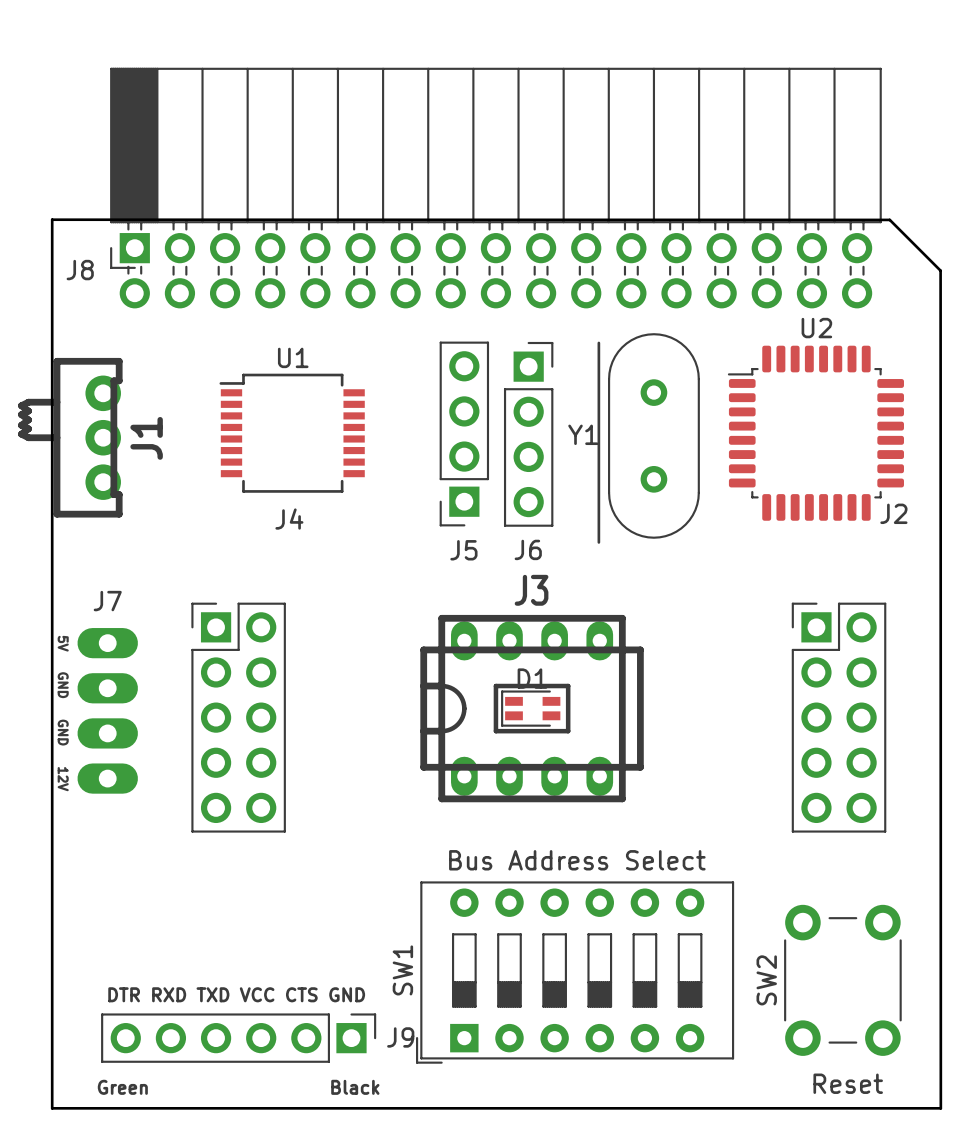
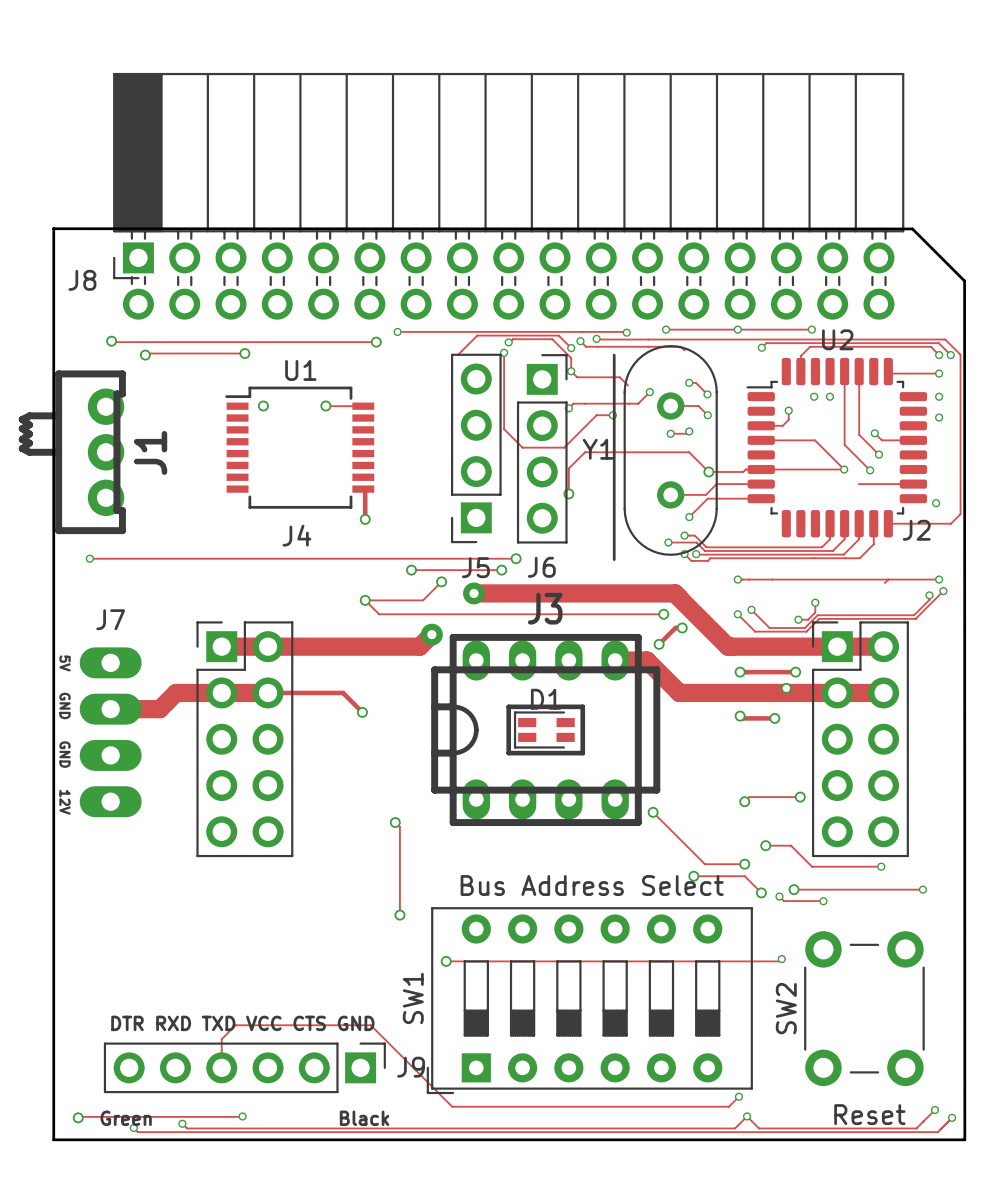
track: none -> (666, 329) (811, 329)
via: none -> (666, 329)
via: none -> (737, 329)
via: none -> (811, 329)
track: none -> (397, 331) (626, 332)
via: none -> (397, 331)
via: none -> (626, 332)
track: none -> (596, 338) (945, 339) (960, 354) (960, 514) (951, 523) (888, 523)
via: none -> (596, 338)
track: none -> (111, 341) (376, 342)
via: none -> (111, 341)
track: none -> (580, 341) (586, 346) (680, 346) (684, 350)
via: none -> (580, 341)
via: none -> (376, 342)
track: none -> (508, 342) (512, 339) (552, 339) (571, 358) (571, 371) (577, 377) (619, 377) (628, 385)
via: none -> (508, 342)
track: none -> (761, 347) (766, 343) (938, 343) (953, 357)
via: none -> (761, 347)
track: none -> (571, 348) (558, 335) (477, 335) (457, 355)
via: none -> (571, 348)
track: none -> (504, 352) (504, 429) (522, 447) (564, 447) (596, 415) (612, 415)
via: none -> (504, 352)
track: none -> (244, 353) (146, 353) (145, 355)
via: none -> (244, 353)
via: none -> (145, 355)
track: none -> (939, 355) (930, 346) (810, 346) (800, 356) (800, 371)
via: none -> (939, 355)
via: none -> (950, 355)
via: none -> (571, 371)
track: none -> (844, 371) (844, 444) (870, 470)
track: none -> (859, 371) (859, 434) (878, 454)
track: none -> (888, 371) (890, 373) (936, 373)
via: none -> (939, 373)
track: none -> (689, 382) (695, 382) (707, 394)
via: none -> (689, 382)
track: none -> (649, 392) (638, 403) (573, 403) (568, 408)
via: none -> (649, 392)
via: none -> (707, 394)
via: none -> (814, 396)
via: none -> (829, 396)
via: none -> (939, 396)
via: none -> (263, 405)
track: none -> (326, 406) (363, 406)
via: none -> (325, 405)
track: none -> (670, 405) (698, 405) (707, 415)
via: none -> (568, 408)
track: none -> (788, 410) (788, 419) (782, 425) (761, 425)
via: none -> (788, 410)
via: none -> (612, 415)
via: none -> (707, 415)
via: none -> (939, 417)
track: none -> (689, 431) (686, 433) (670, 433)
via: none -> (689, 431)
via: none -> (670, 433)
track: none -> (875, 433) (881, 440) (913, 440)
via: none -> (874, 433)
track: none -> (761, 440) (815, 440) (844, 469) (745, 469) (743, 471) (708, 471) (689, 452) (585, 452) (568, 468) (568, 493)
via: none -> (878, 454)
via: none -> (844, 469)
via: none -> (870, 470)
via: none -> (708, 471)
track: none -> (761, 484) (716, 484) (705, 494) (670, 494)
track: none -> (858, 484) (913, 484)
track: none -> (363, 489) (365, 491) (365, 519)
via: none -> (568, 493)
track: none -> (761, 498) (707, 498) (689, 517)
via: none -> (936, 503)
via: none -> (689, 517)
via: none -> (365, 519)
track: none -> (830, 523) (830, 539) (821, 547) (706, 547) (694, 535) (684, 535)
track: none -> (844, 523) (844, 539) (832, 550) (705, 550) (696, 542) (668, 542)
track: none -> (859, 523) (859, 539) (843, 554) (696, 554)
track: none -> (873, 523) (873, 544) (859, 558) (710, 558) (707, 560) (691, 560) (684, 554)
via: none -> (684, 535)
via: none -> (668, 542)
via: none -> (684, 554)
via: none -> (696, 554)
track: none -> (89, 558) (516, 558)
via: none -> (89, 558)
via: none -> (516, 558)
track: none -> (411, 570) (501, 570)
via: none -> (411, 570)
via: none -> (501, 570)
track: none -> (737, 579) (939, 579)
via: none -> (737, 579)
track: none -> (888, 579) (884, 583)
via: none -> (939, 579)
track: none -> (441, 581) (423, 600) (365, 600) (379, 614) (663, 614)
via: none -> (441, 581)
track: none -> (943, 591) (916, 618) (819, 618) (806, 631) (755, 631) (737, 614)
via: none -> (943, 591)
track: none -> (473, 593) (675, 593) (727, 646) (883, 646)
via: none -> (473, 593)
track: none -> (929, 595) (929, 599) (914, 615) (817, 615) (804, 627) (769, 627) (751, 610)
via: none -> (929, 595)
via: none -> (365, 600)
track: none -> (815, 602) (815, 612) (808, 619) (798, 619)
via: none -> (815, 602)
via: none -> (751, 609)
via: none -> (663, 614)
via: none -> (737, 614)
via: none -> (798, 619)
track: none -> (682, 627) (675, 627) (659, 644)
via: none -> (682, 627)
track: none -> (431, 634) (419, 646) (221, 646)
via: none -> (431, 634)
via: none -> (659, 644)
track: none -> (615, 660) (647, 660) (679, 692) (883, 692)
track: none -> (740, 672) (795, 672)
via: none -> (740, 672)
via: none -> (795, 672)
via: none -> (786, 688)
track: none -> (110, 709) (159, 709) (176, 692) (343, 692) (362, 712)
via: none -> (362, 712)
track: none -> (740, 716) (742, 718) (774, 718)
via: none -> (740, 716)
via: none -> (774, 718)
track: none -> (800, 797) (749, 797) (744, 801)
via: none -> (800, 797)
via: none -> (744, 801)
track: none -> (653, 812) (704, 864) (744, 864)
via: none -> (653, 812)
track: none -> (395, 822) (399, 827) (399, 915)
via: none -> (395, 822)
track: none -> (765, 845) (791, 845) (812, 866) (881, 866)
via: none -> (765, 845)
via: none -> (744, 864)
via: none -> (881, 866)
track: none -> (693, 876) (744, 876) (761, 892)
via: none -> (693, 876)
track: none -> (794, 889) (922, 889)
via: none -> (794, 889)
via: none -> (922, 889)
via: none -> (761, 892)
track: none -> (779, 896) (783, 901) (823, 901)
via: none -> (779, 896)
via: none -> (823, 901)
via: none -> (399, 915)
track: none -> (781, 959) (779, 961) (446, 961)
via: none -> (781, 959)
via: none -> (446, 961)
track: none -> (221, 1067) (221, 1039) (235, 1025) (370, 1025) (452, 1106) (729, 1106) (739, 1096)
via: none -> (738, 1096)
track: none -> (934, 1110) (916, 1128) (759, 1128) (747, 1116) (735, 1128) (187, 1128) (182, 1123)
via: none -> (934, 1109)
track: none -> (242, 1116) (78, 1117)
via: none -> (242, 1116)
via: none -> (747, 1116)
via: none -> (78, 1117)
track: none -> (952, 1117) (937, 1132) (137, 1132) (133, 1128)
via: none -> (952, 1117)
via: none -> (182, 1123)
via: none -> (133, 1128)

